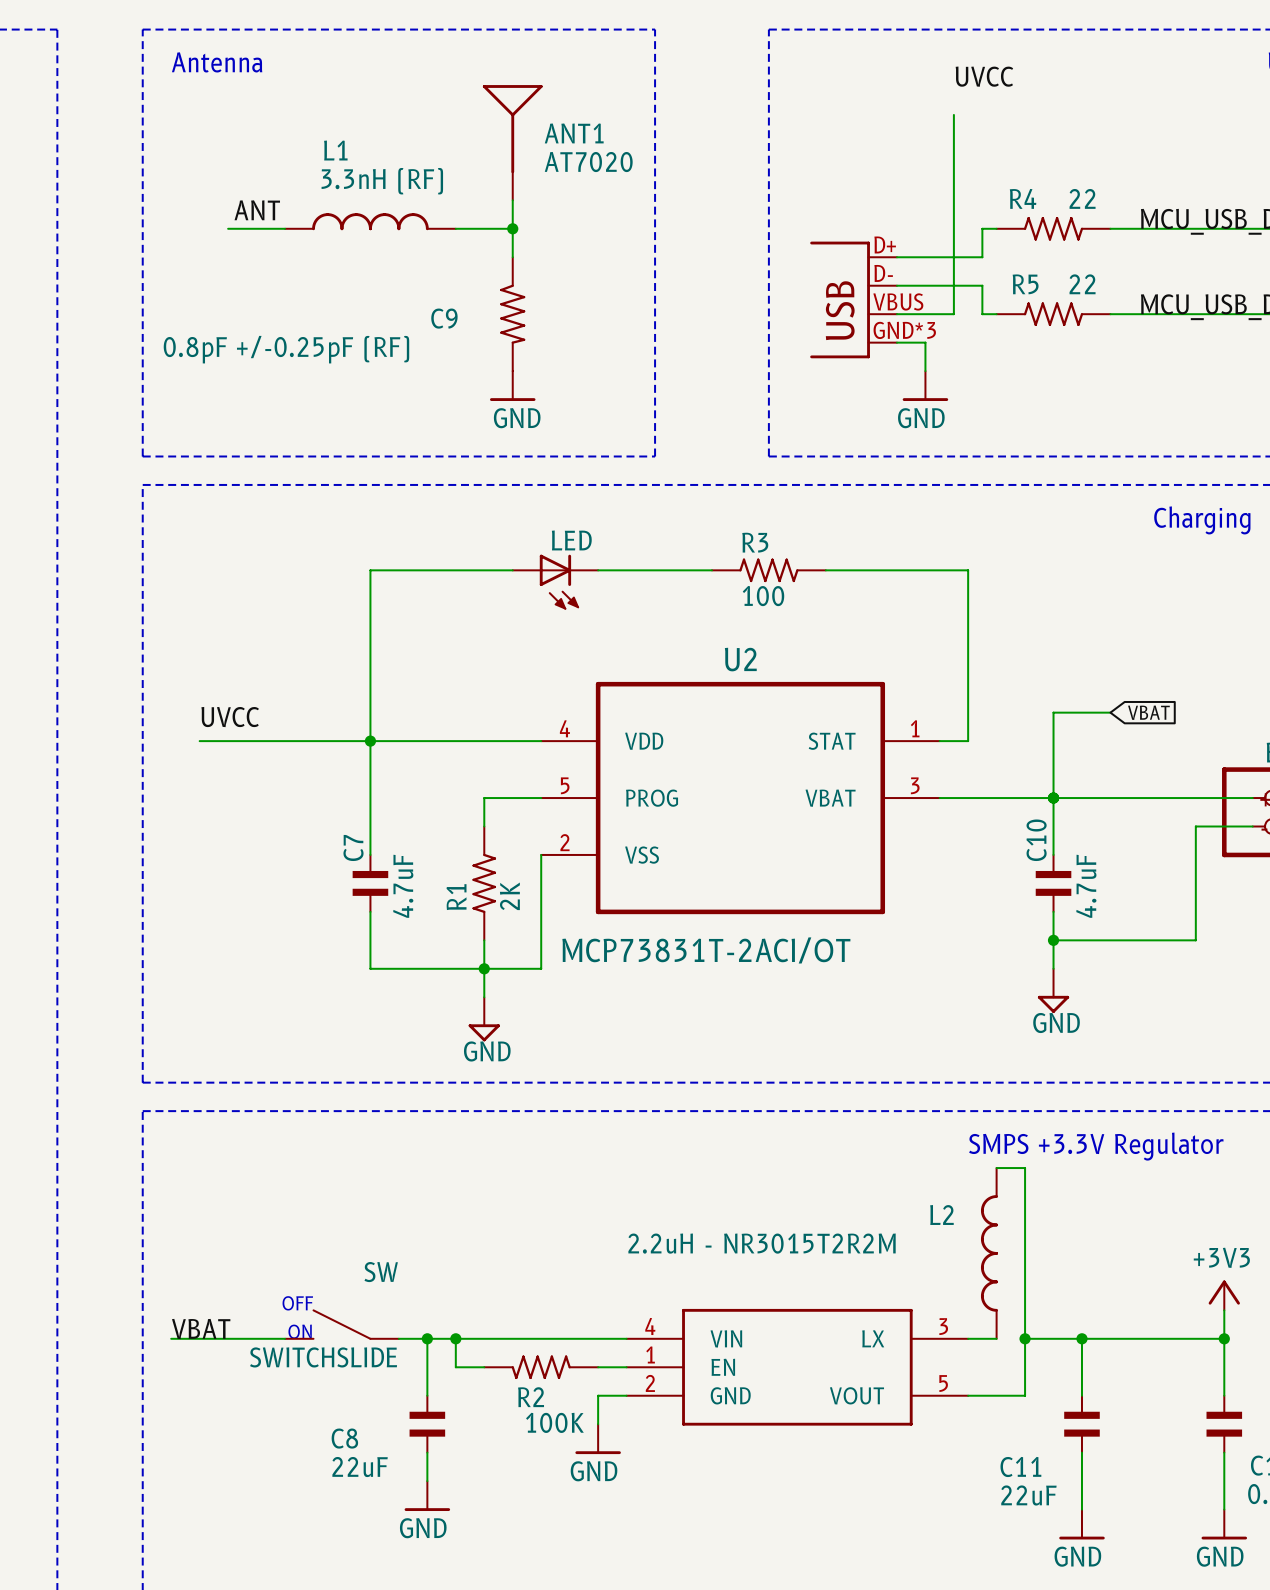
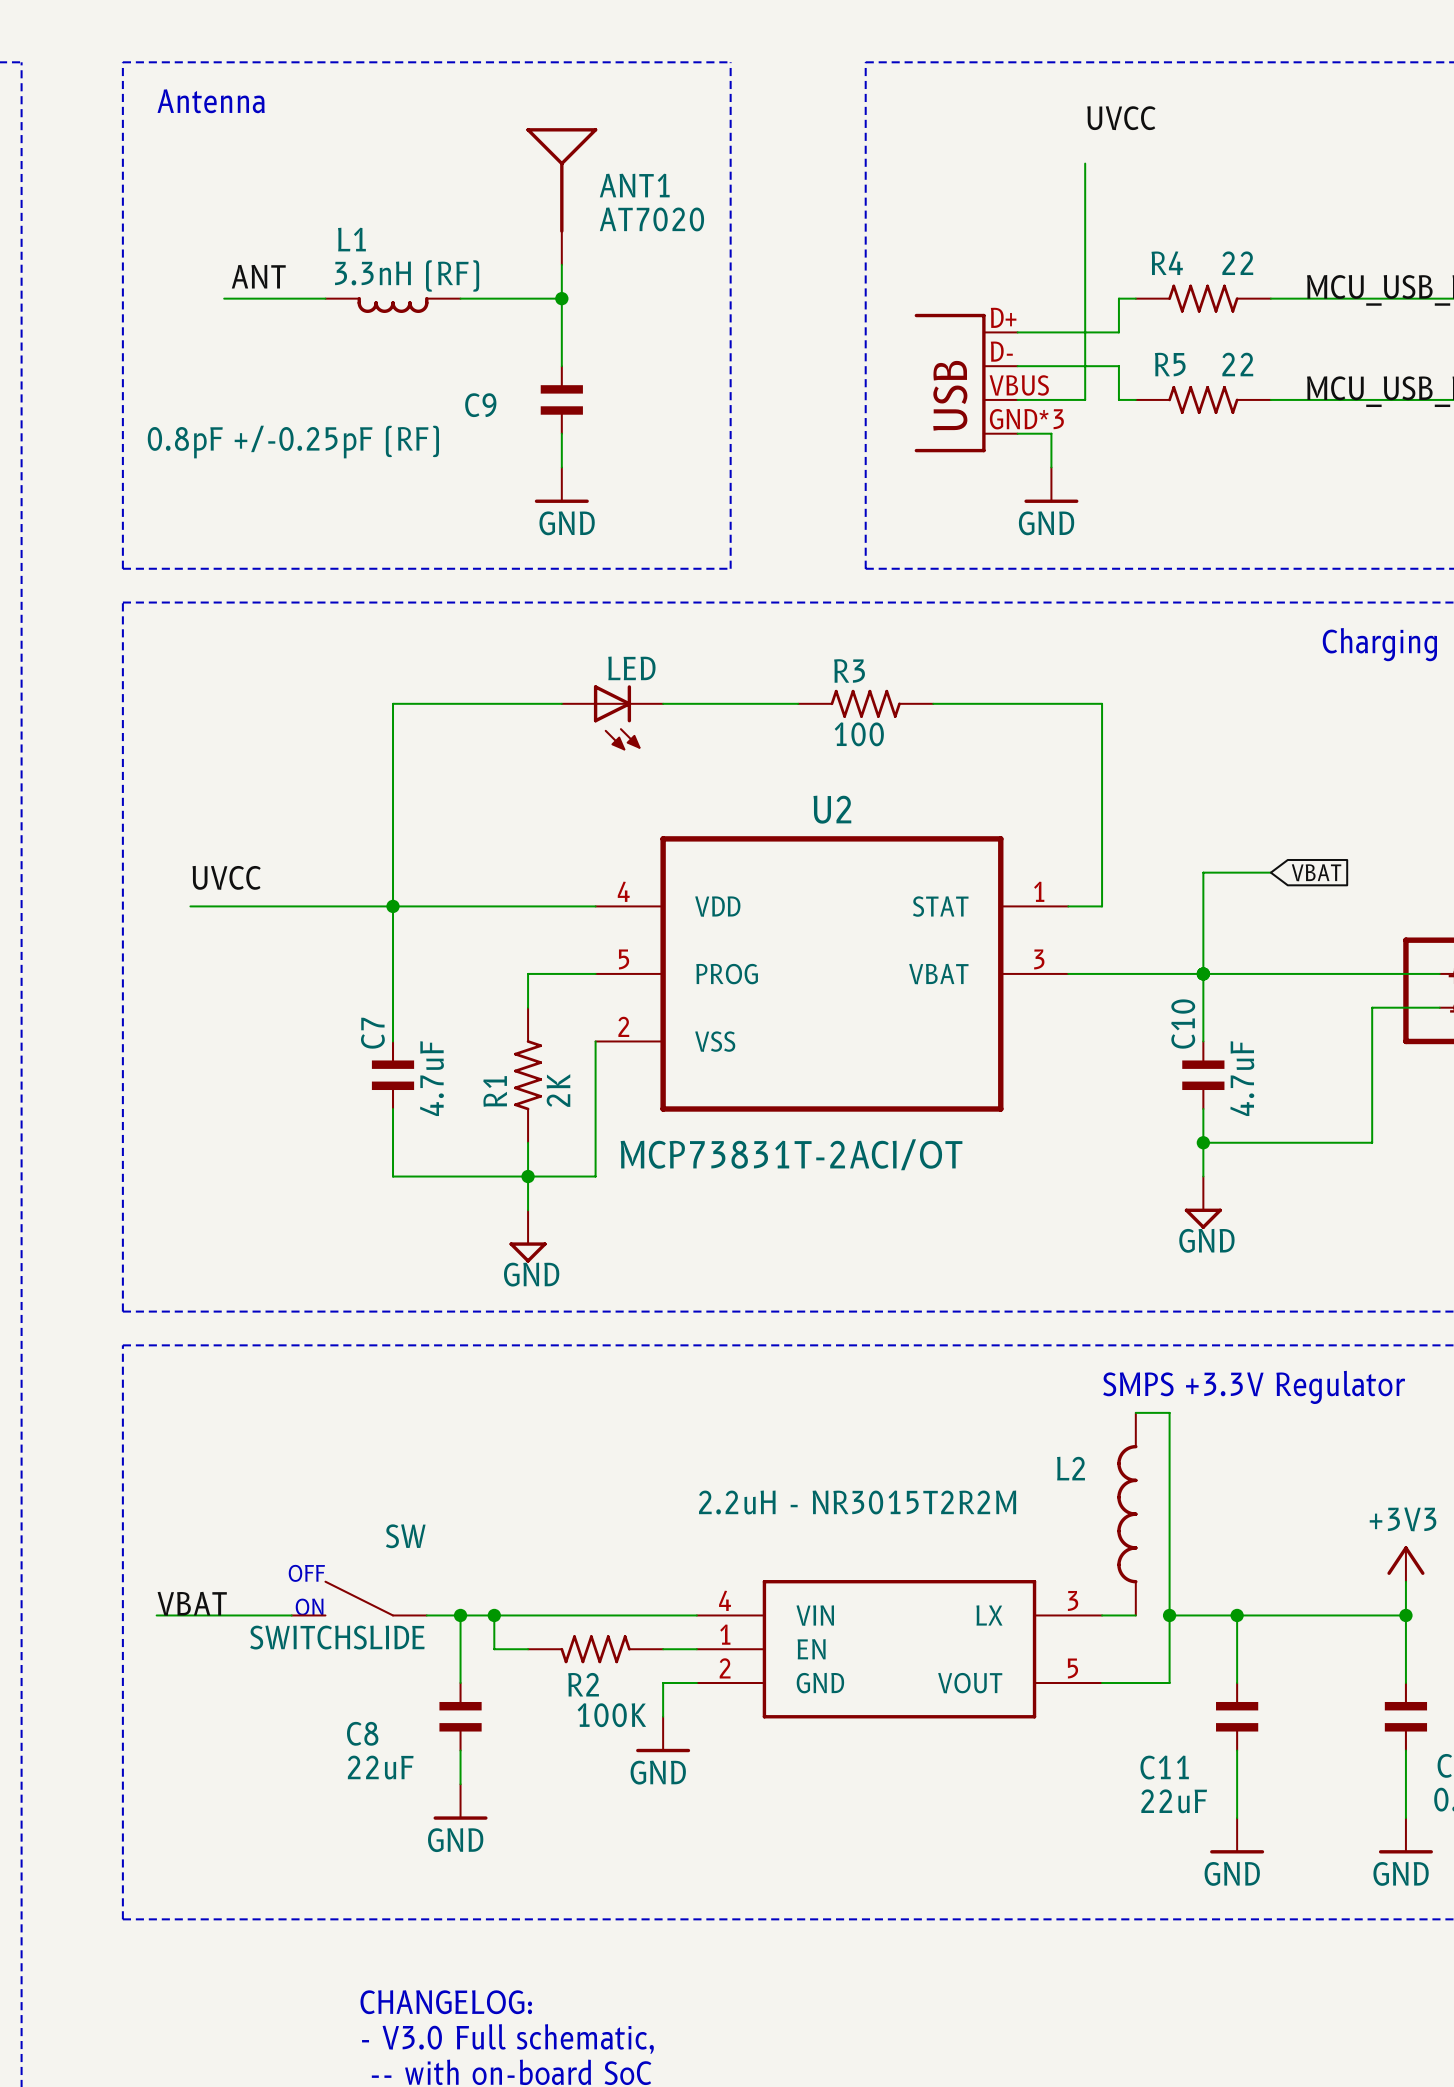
L1 symbol: [285, 213, 456, 231] -> [325, 296, 461, 314]
C9 symbol: [500, 257, 526, 372] -> [540, 365, 583, 435]

